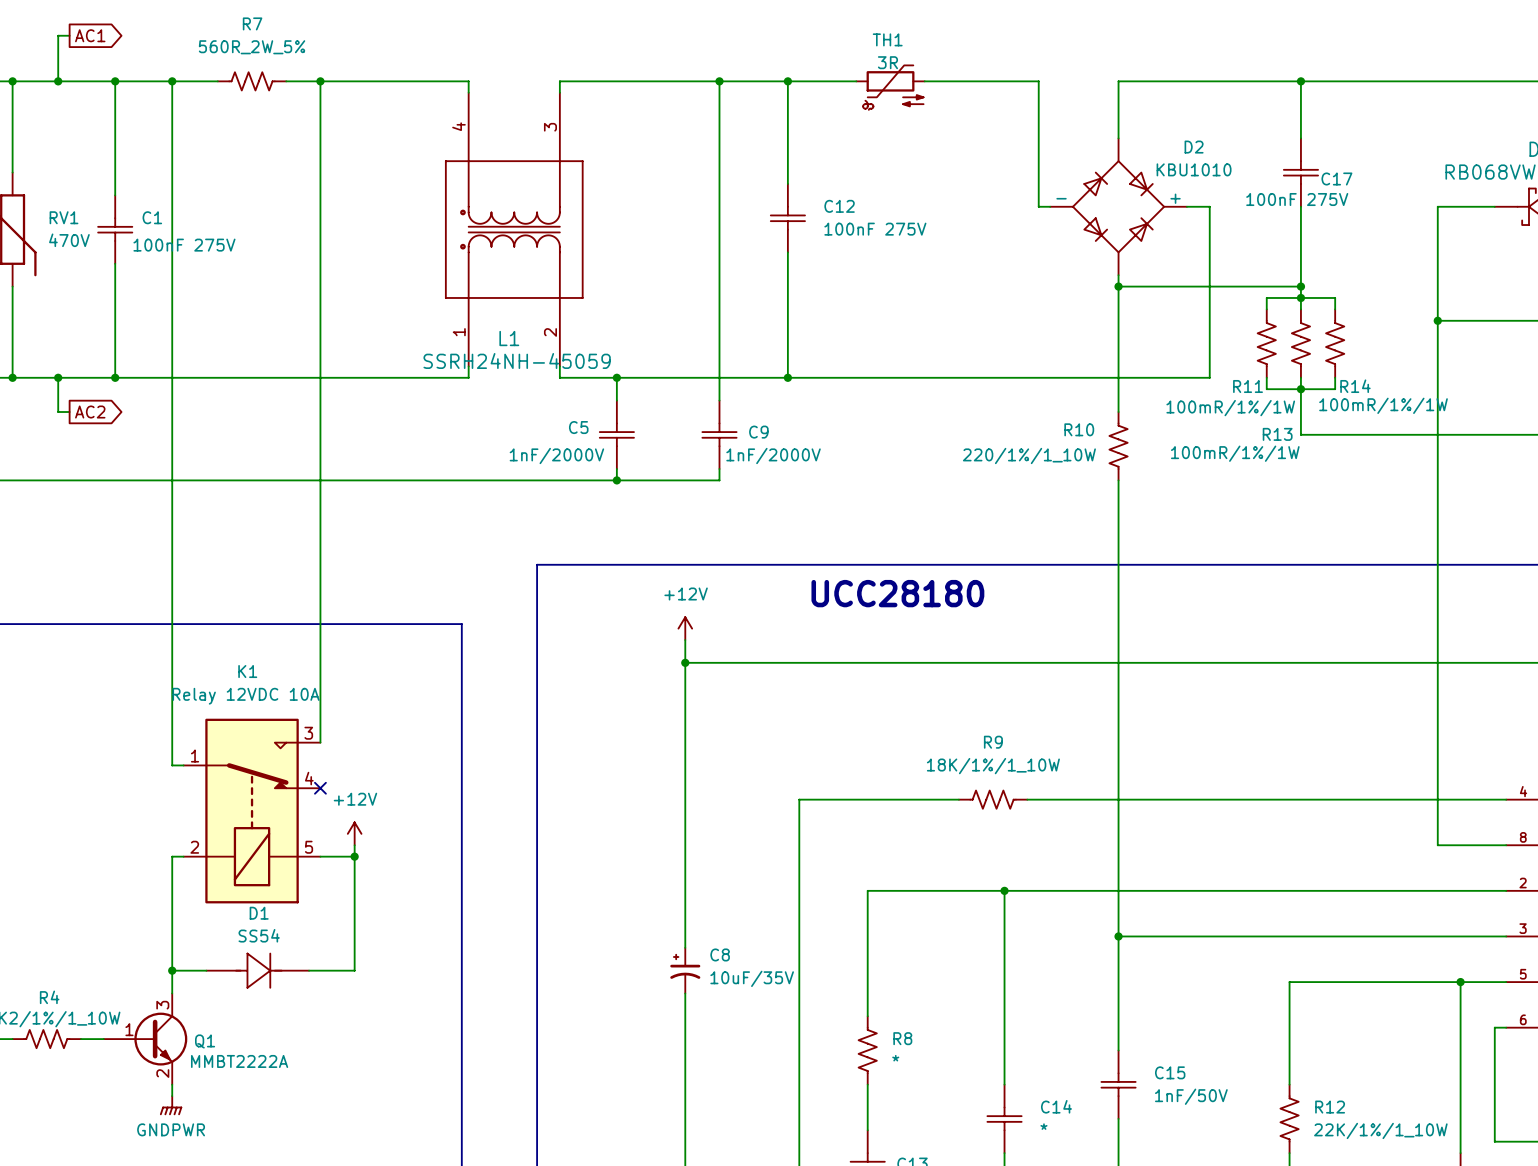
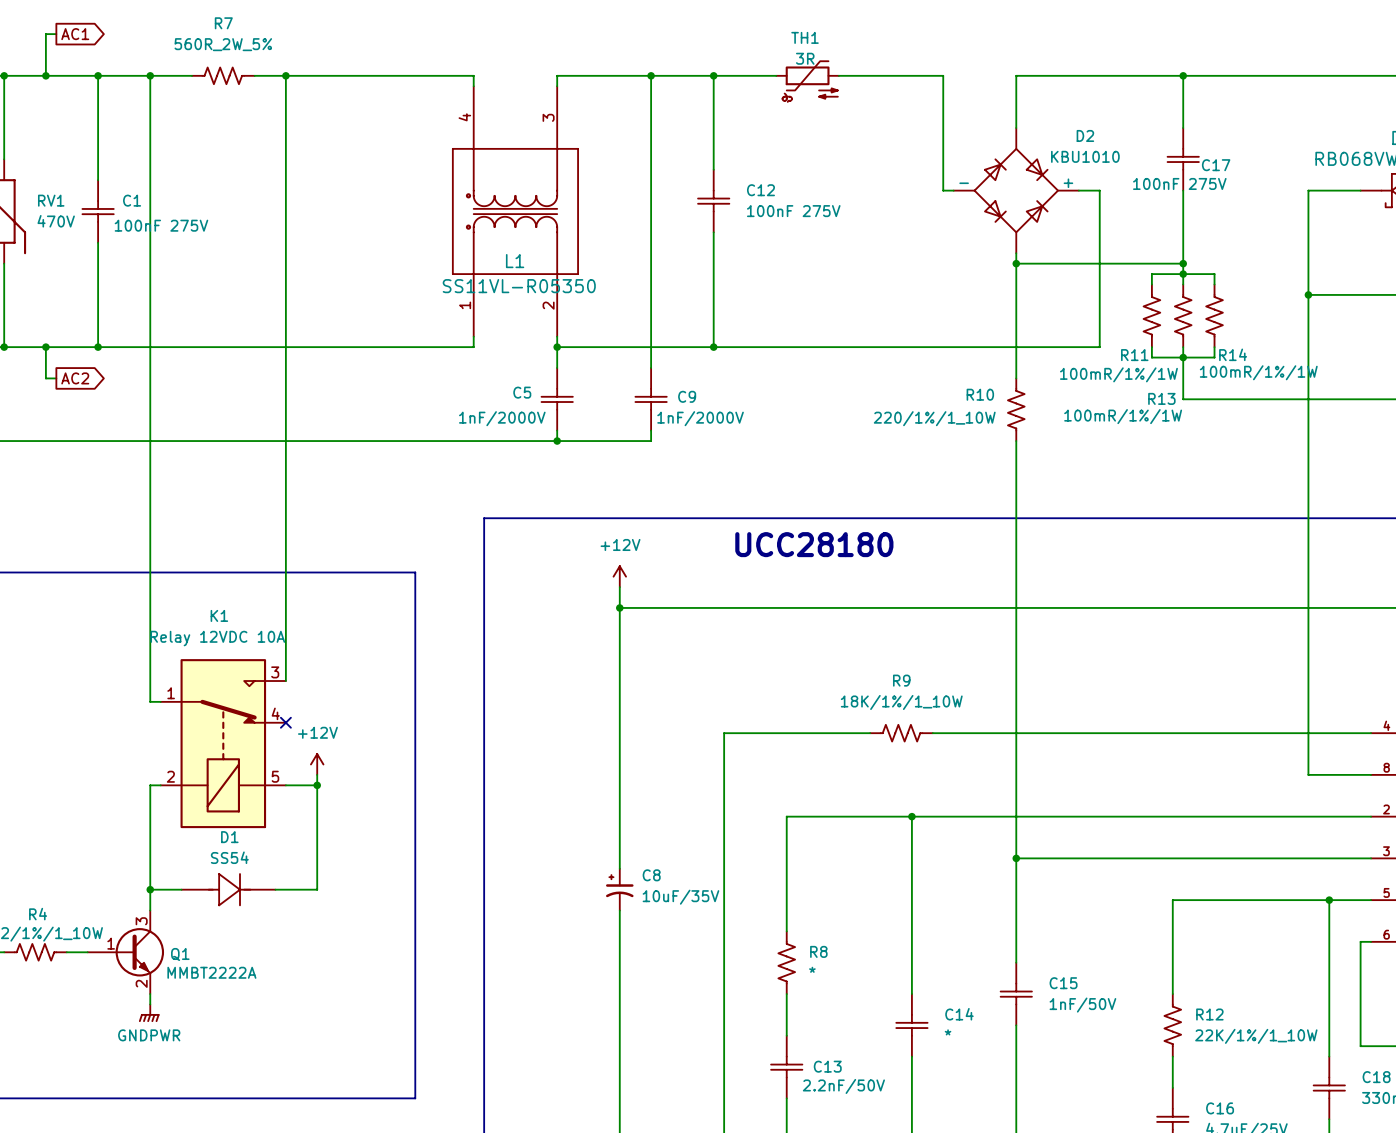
wire: (468, 81) (468, 92) -> (421, 75) (473, 75) (473, 86)
wire: (616, 81) (559, 81) (559, 92) -> (557, 75) (557, 86)
L1 position: (514, 229) -> (515, 211)
L1 name position: L1 (509, 338) -> L1 (515, 261)
L1 value: SSRH24NH-45059 (517, 361) -> SS11VL-R05350 (519, 286)
wire: (468, 366) (468, 377) -> (473, 336) (473, 347) (421, 347)
wire: (559, 366) (559, 377) (616, 377) -> (557, 336) (557, 347)

